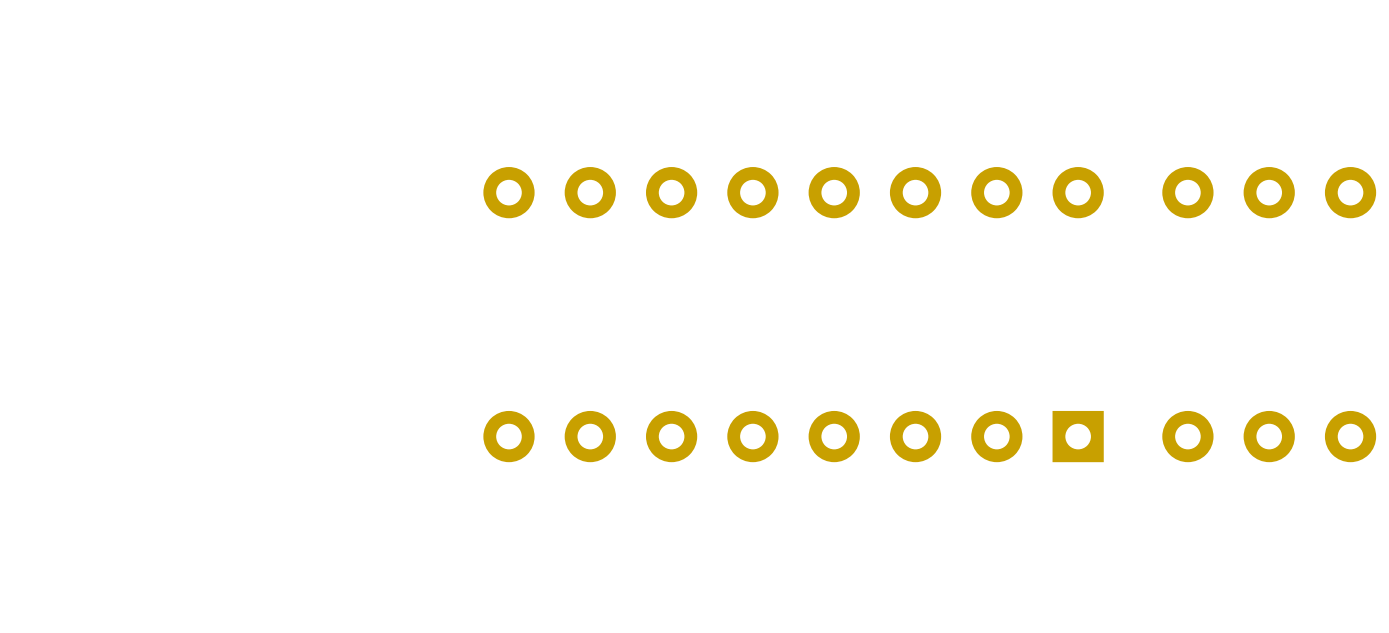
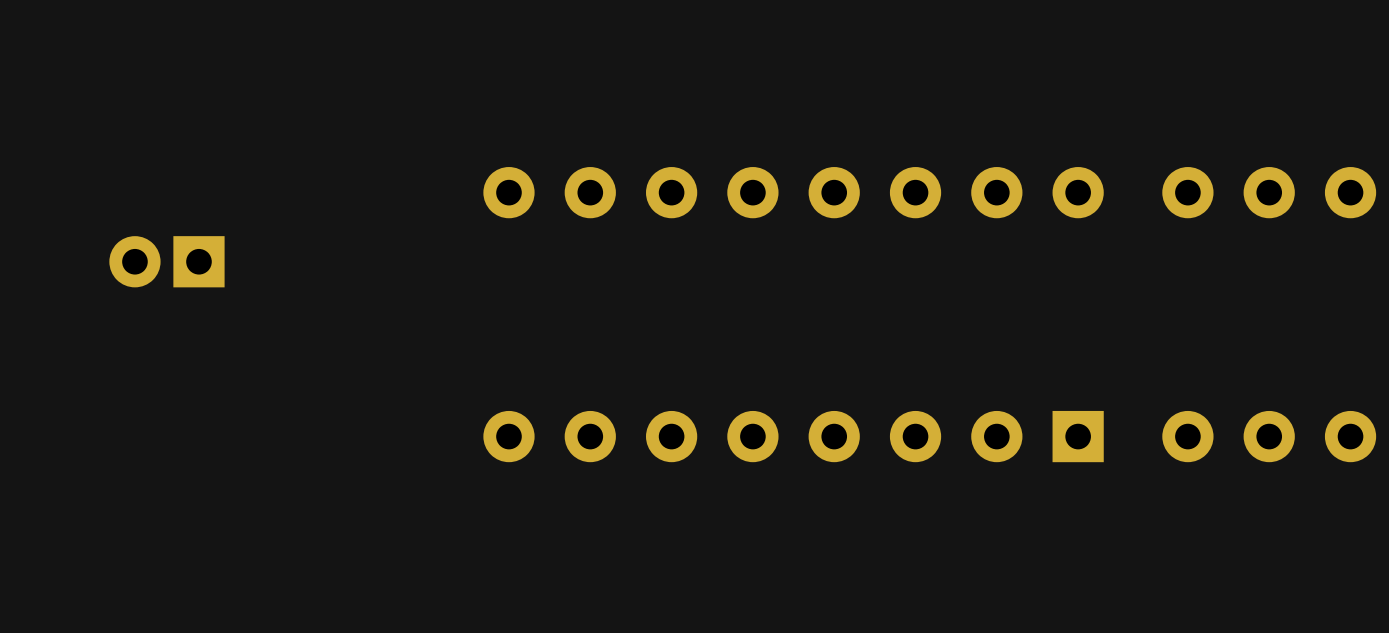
part: none -> (166, 261)

